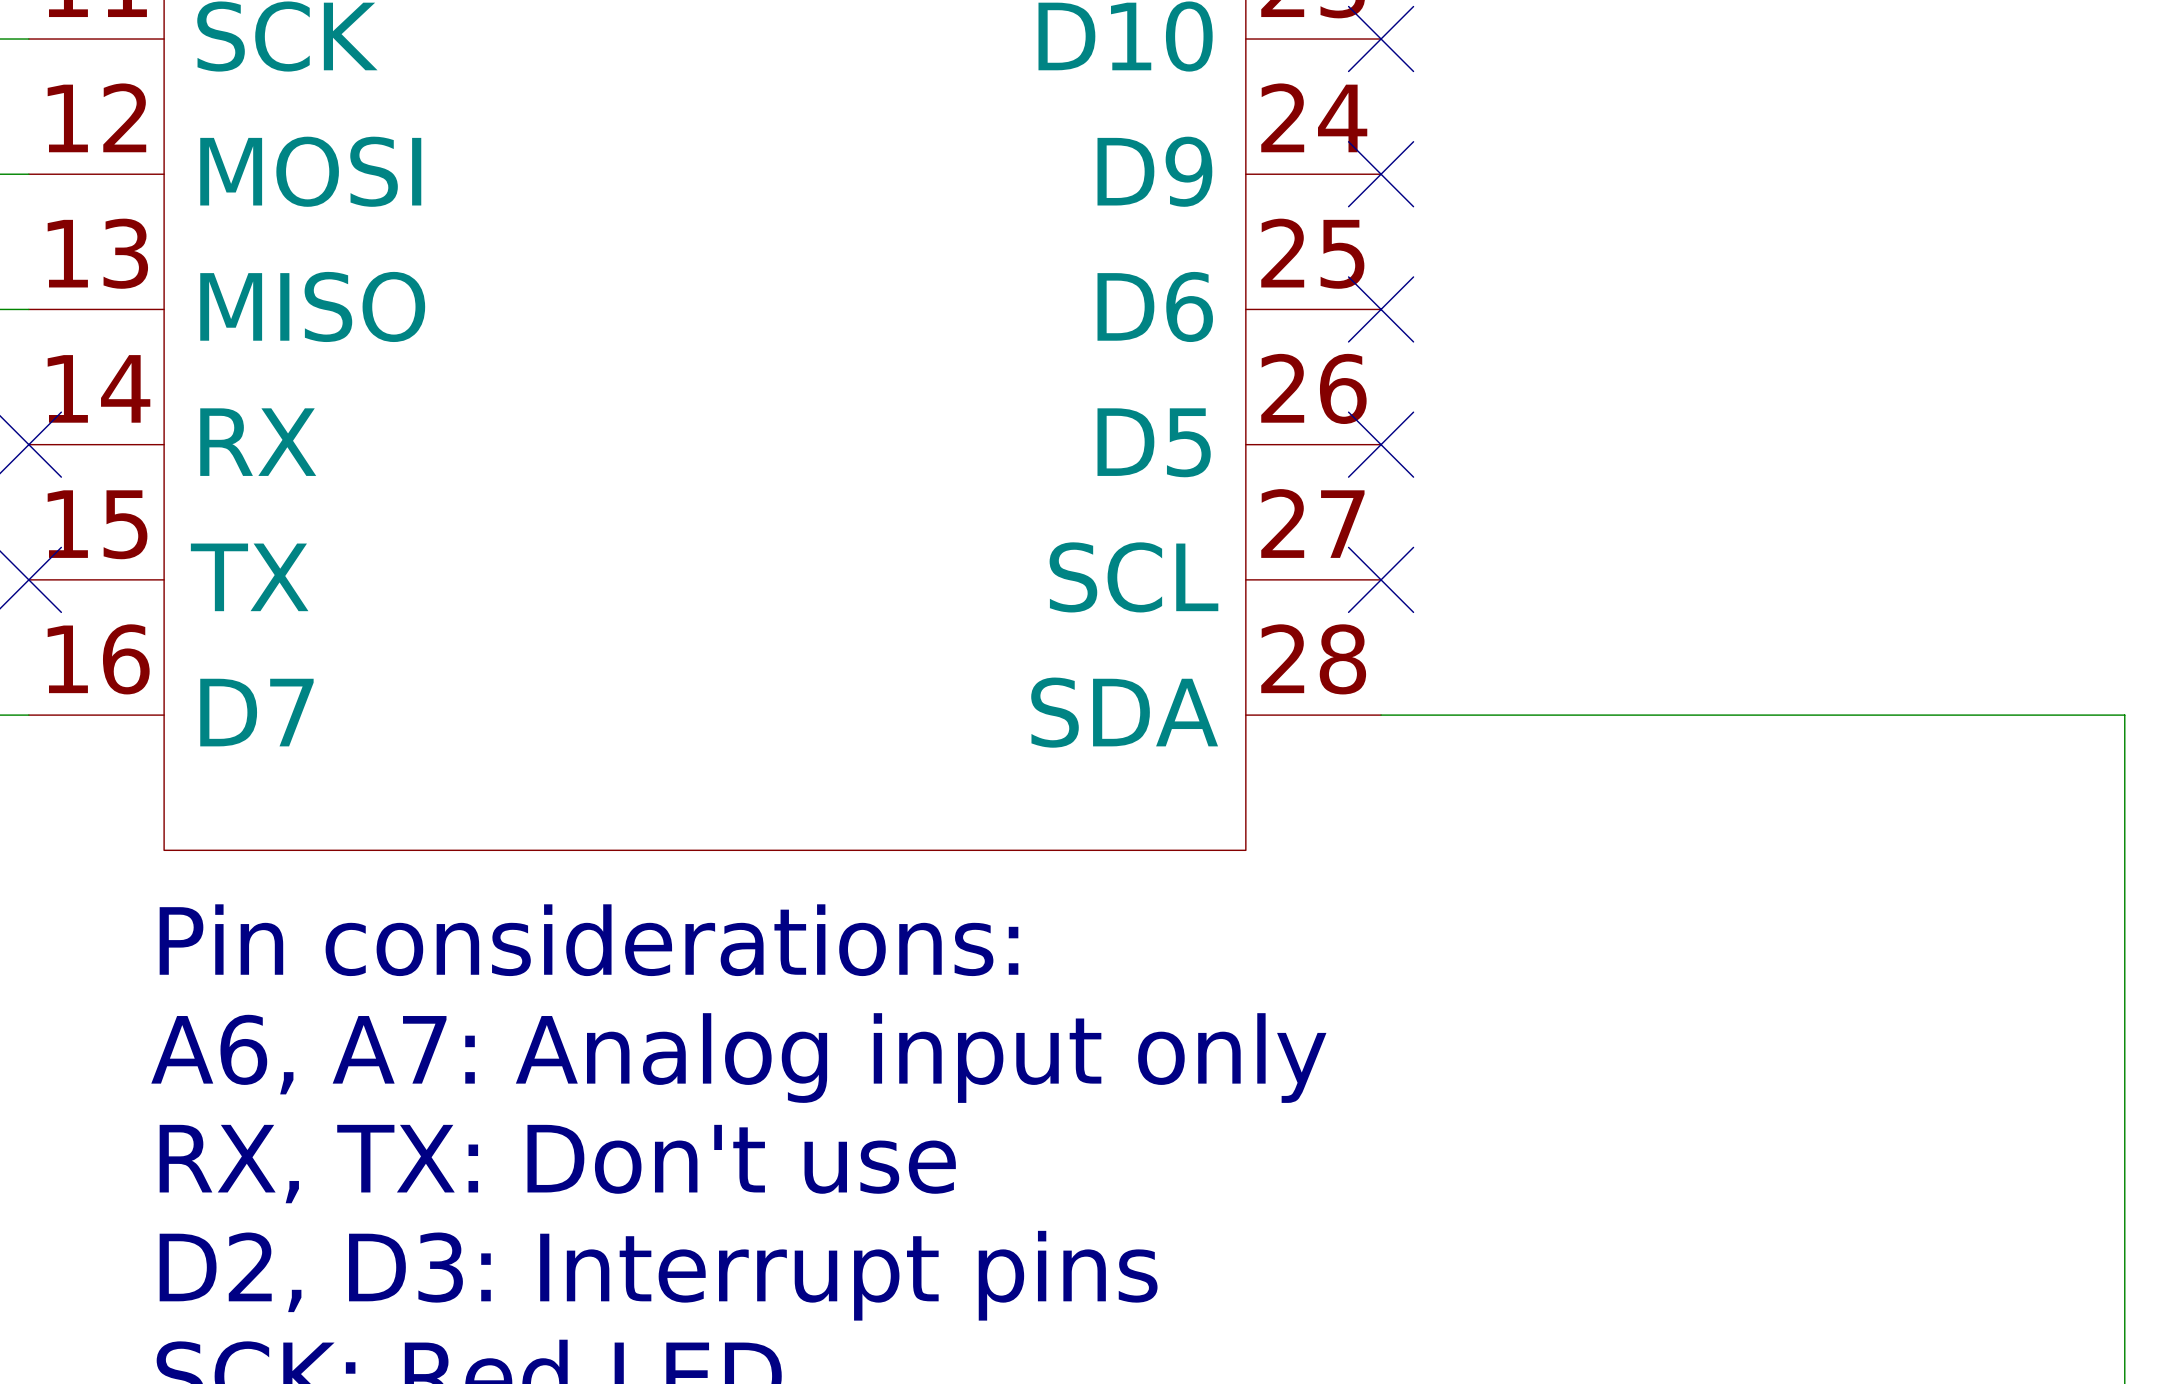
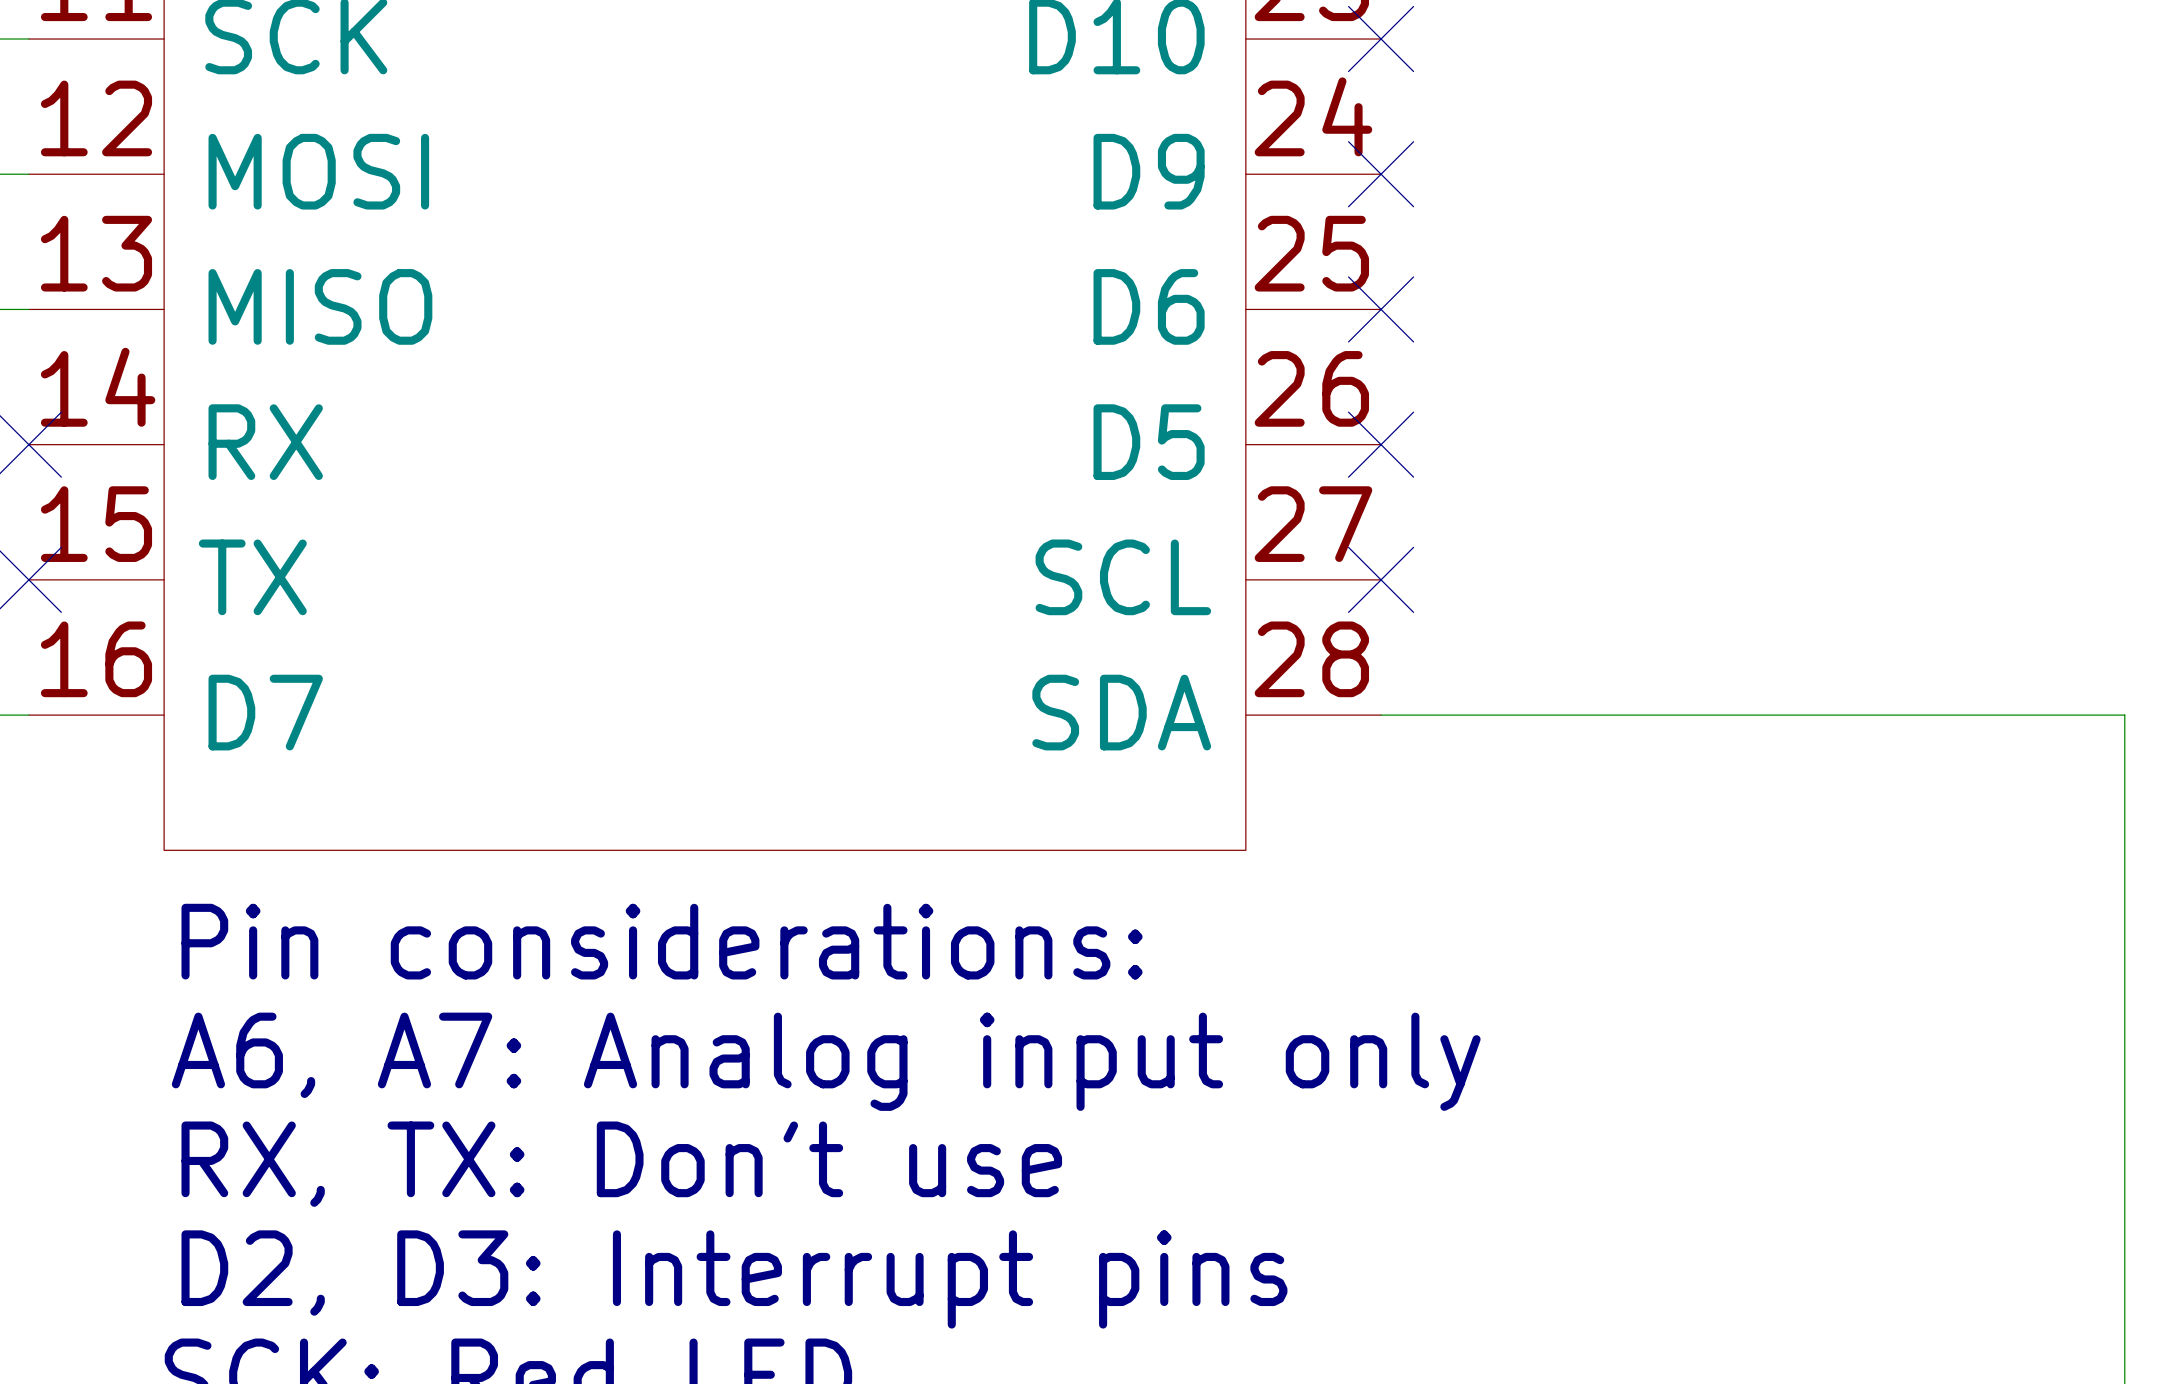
text position: Pin considerations: (589, 940) -> Pin considerations: (662, 941)
text position: A6, A7: Analog input only (738, 1058) -> A6, A7: Analog input only (826, 1061)
text position: RX, TX: Don't use (557, 1164) -> RX, TX: Don't use (621, 1164)
text position: D2, D3: Interrupt pins (658, 1275) -> D2, D3: Interrupt pins (734, 1279)

